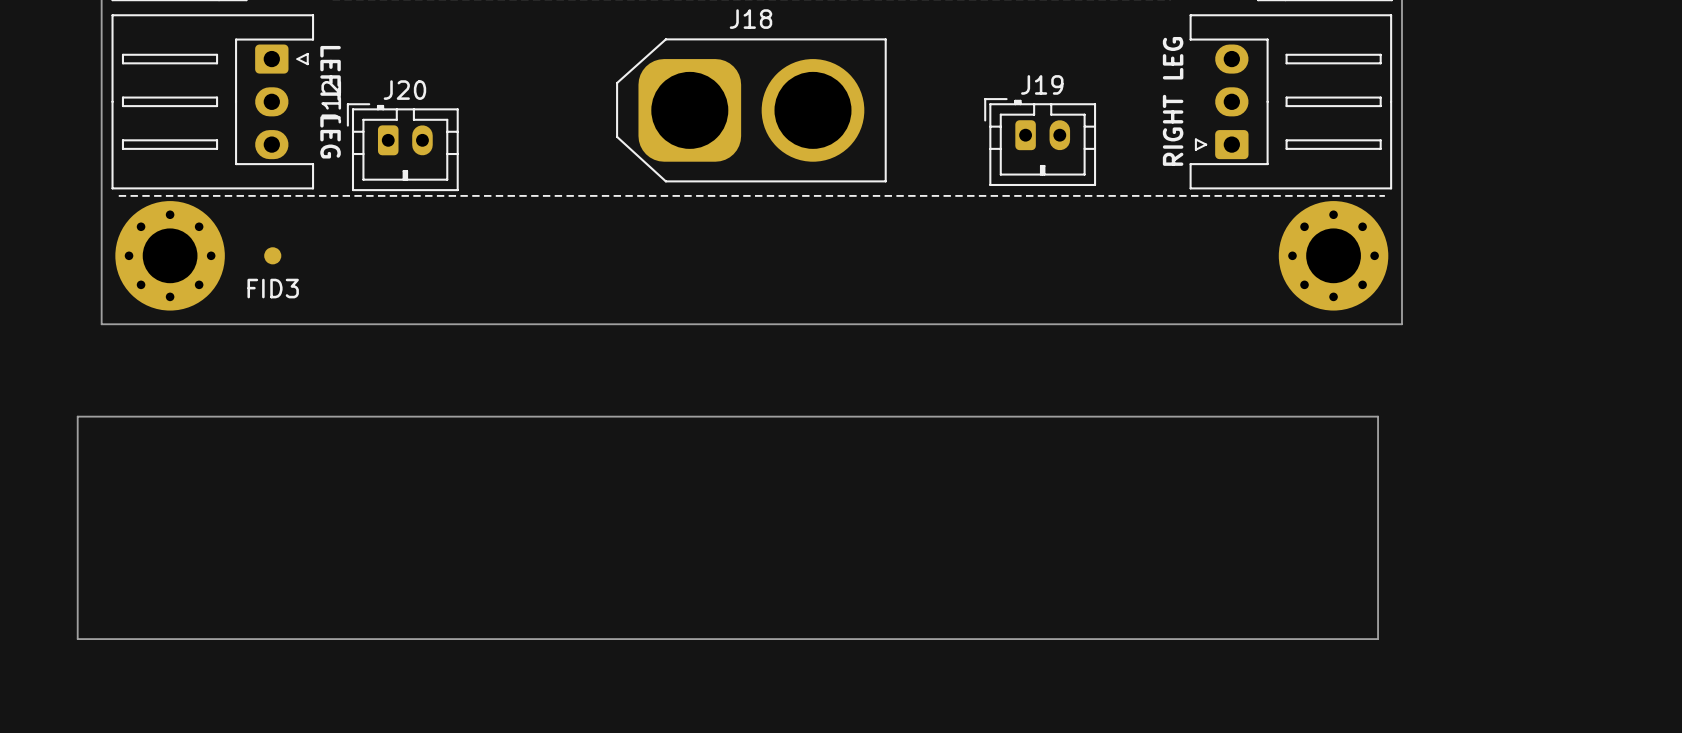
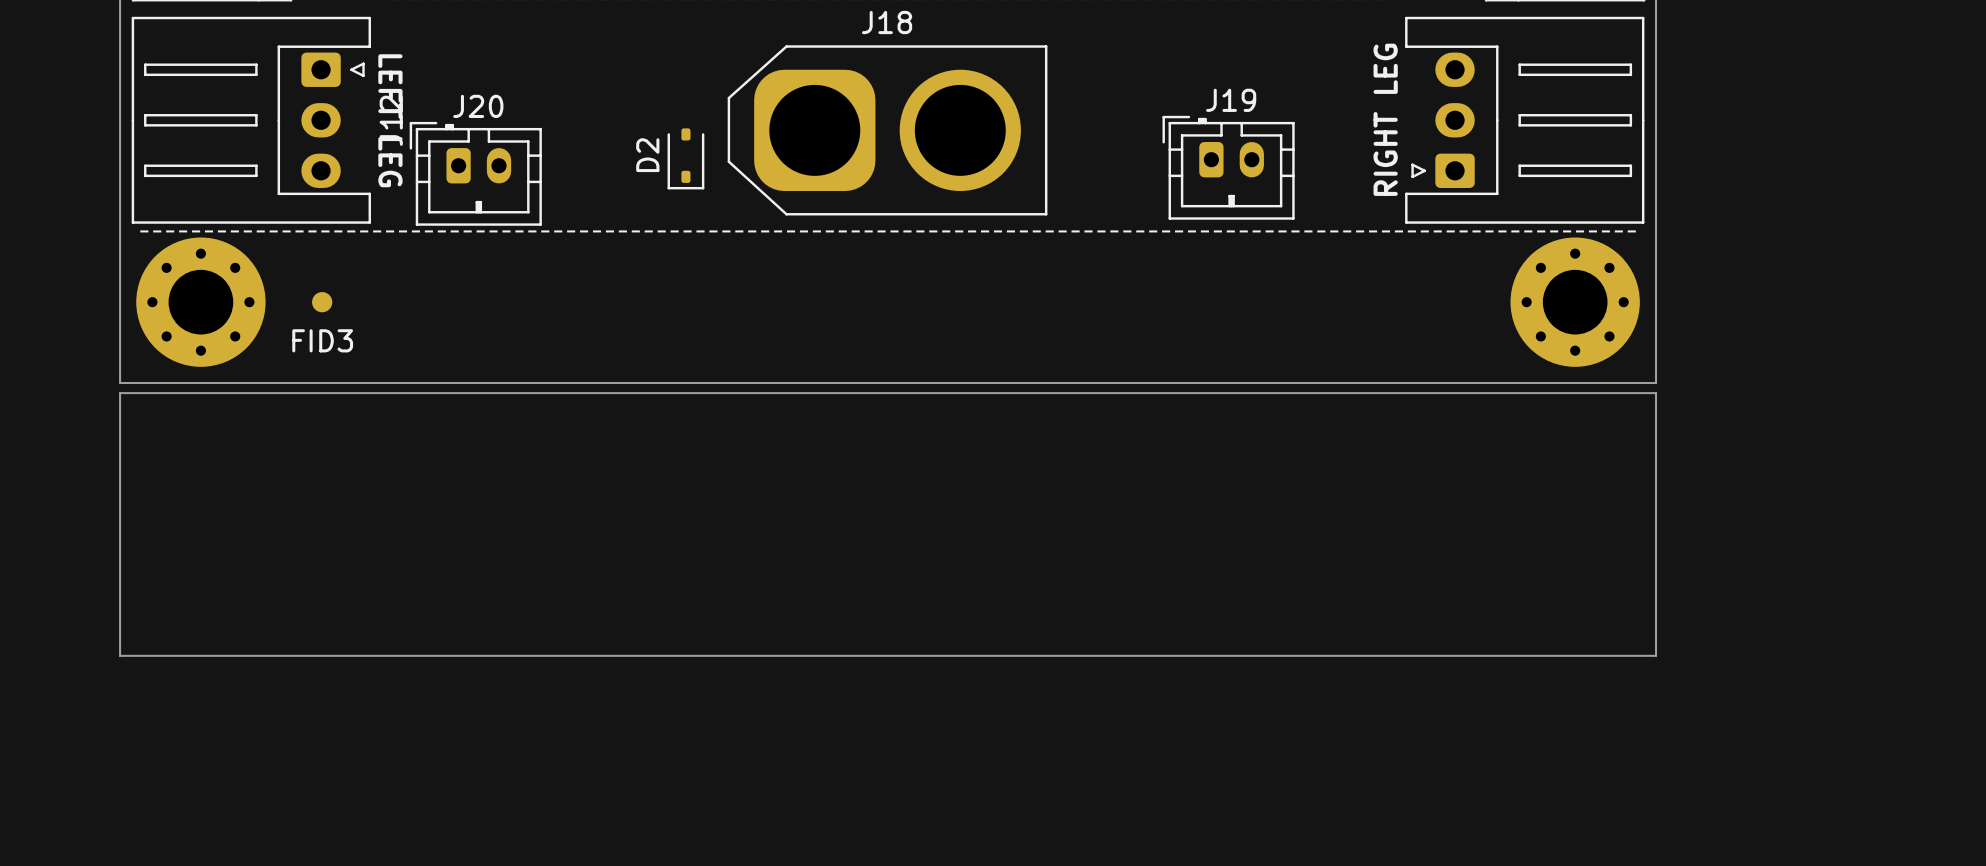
D2: none -> (685, 158)
board edge: (77, 416) (1378, 416) (1378, 639) (77, 639) (77, 416) -> (120, 393) (1656, 393) (1656, 655) (120, 655) (120, 393)

